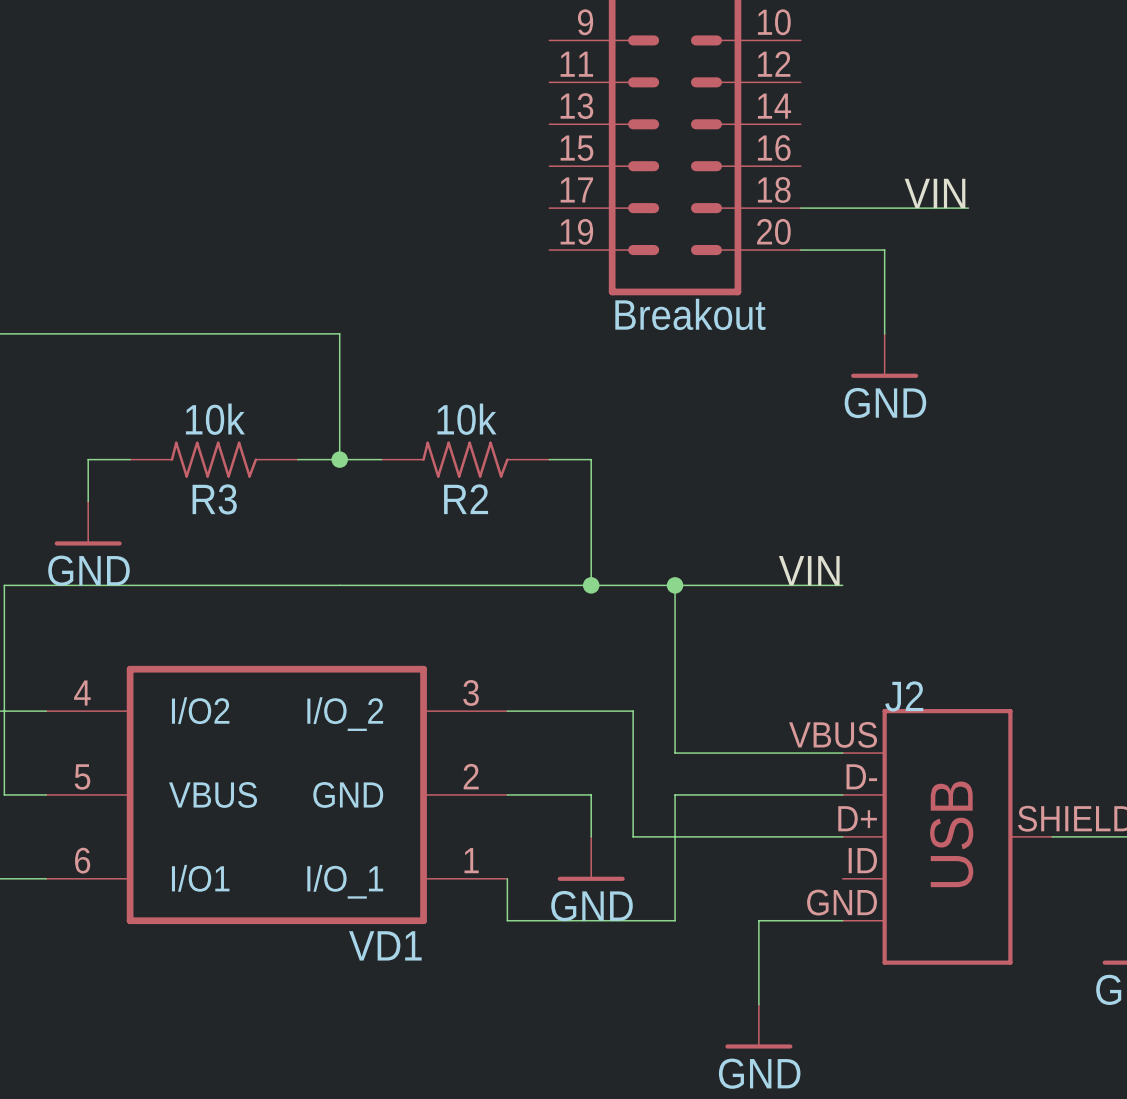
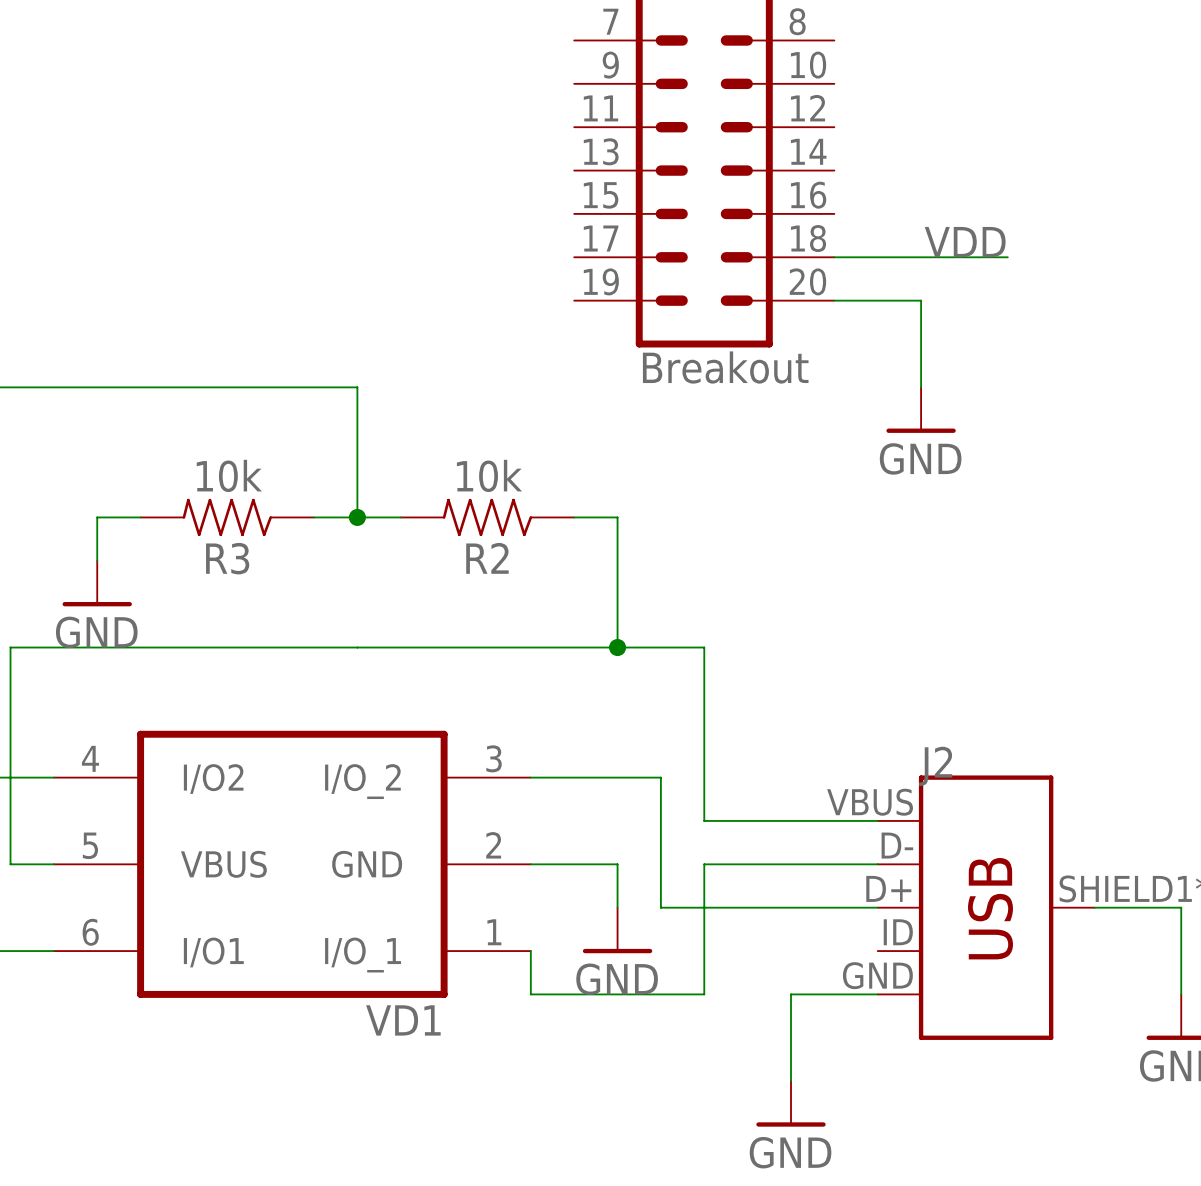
label: VIN (935, 193) -> VDD (965, 242)
label: VIN (809, 570) -> none
wire: (675, 585) (842, 585) -> none
junction: (675, 585) -> none

